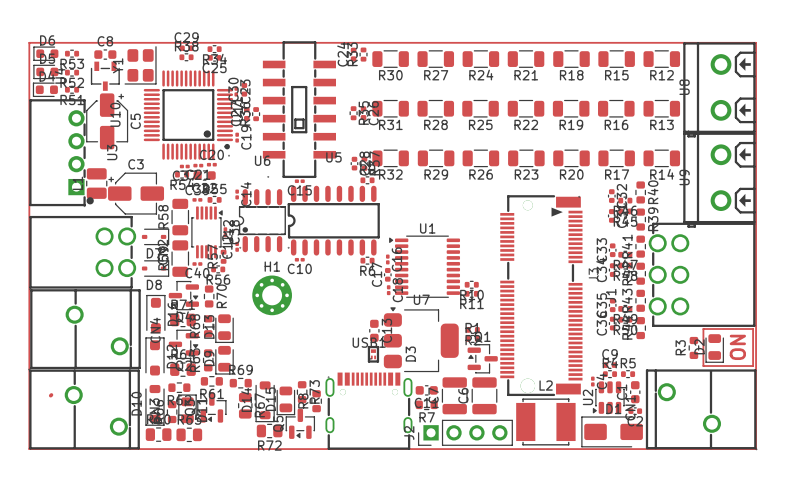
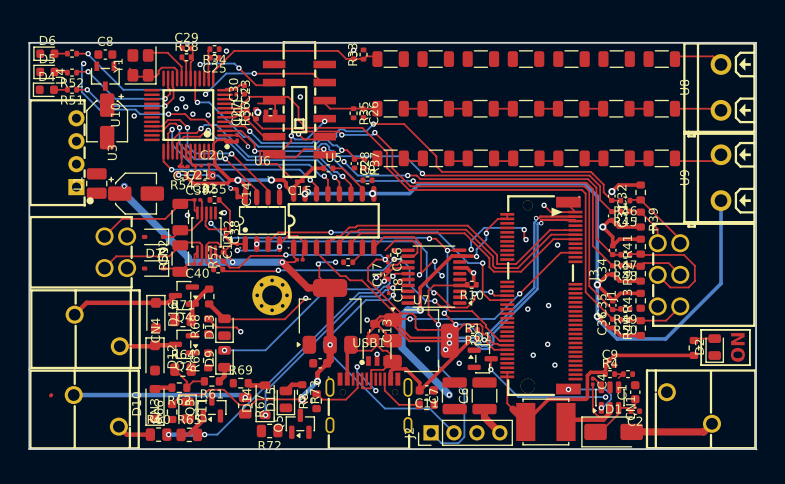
top track: (29, 42) (756, 42) (756, 449) (29, 449) (29, 42) -> none
board edge: none -> (29, 42) (756, 42) (756, 449) (29, 449) (29, 42)
top track: none -> (192, 50) (190, 78)
top track: none -> (208, 50) (208, 78)
via: none -> (353, 50)
via: none -> (226, 51)
top track: none -> (54, 53) (67, 53)
top track: none -> (76, 53) (88, 53)
bottom track: none -> (88, 53) (123, 89) (162, 89) (164, 91)
via: none -> (88, 53)
top track: none -> (149, 53) (167, 52) (181, 66) (181, 78)
C24 name: C24 (342, 54) -> none
top track: none -> (377, 56) (366, 56) (363, 59) (346, 58) (338, 50) (234, 50) (213, 71) (213, 78)
top track: none -> (674, 56) (712, 56) (721, 64)
top track: none -> (183, 59) (186, 62) (186, 78)
R53 name: R53 (72, 63) -> none
bottom track: none -> (83, 63) (81, 65) (81, 92) (99, 109) (135, 109) (140, 114) (168, 114)
via: none -> (83, 63)
bottom track: none -> (200, 64) (234, 63) (238, 68)
via: none -> (200, 64)
top track: none -> (129, 68) (137, 76) (155, 76) (161, 67) (174, 67) (177, 70) (177, 78)
top track: none -> (238, 68) (256, 85) (274, 85)
via: none -> (238, 68)
top track: none -> (67, 71) (54, 71)
top track: none -> (76, 71) (88, 71)
bottom track: none -> (88, 71) (115, 98) (165, 98)
via: none -> (88, 71)
top track: none -> (254, 73) (313, 73) (324, 85)
bottom track: none -> (254, 73) (226, 73) (205, 94)
via: none -> (254, 73)
R30 name: R30 (390, 75) -> none
R27 name: R27 (436, 75) -> none
R24 name: R24 (481, 75) -> none
R21 name: R21 (526, 75) -> none
R18 name: R18 (571, 75) -> none
R15 name: R15 (616, 75) -> none
R12 name: R12 (661, 75) -> none
top track: none -> (168, 78) (169, 93) (165, 98)
top track: none -> (172, 78) (173, 98) (164, 105)
top track: none -> (195, 78) (195, 100) (197, 102)
top track: none -> (244, 85) (224, 90)
top track: none -> (54, 89) (67, 89)
top track: none -> (76, 89) (87, 89)
bottom track: none -> (87, 89) (103, 105) (164, 105)
via: none -> (87, 89)
via: none -> (205, 94)
via: none -> (300, 96)
via: none -> (165, 98)
via: none -> (182, 98)
bottom track: none -> (197, 102) (209, 102) (243, 136) (248, 136) (258, 146) (314, 146) (320, 140) (327, 140) (341, 150)
via: none -> (197, 102)
top track: none -> (257, 103) (274, 103) (275, 112)
top track: none -> (324, 103) (330, 108) (377, 108)
via: none -> (164, 105)
via: none -> (185, 106)
top track: none -> (631, 106) (629, 108) (648, 108)
via: none -> (176, 108)
top track: none -> (224, 108) (238, 108) (250, 96) (288, 96) (298, 107) (298, 120) (306, 127) (362, 127) (387, 152) (387, 167) (409, 189) (581, 189) (585, 193) (585, 292) (613, 319) (620, 319)
top track: none -> (403, 108) (422, 108)
top track: none -> (448, 108) (467, 108)
top track: none -> (493, 108) (512, 108)
top track: none -> (539, 108) (557, 108)
top track: none -> (584, 108) (603, 108)
top track: none -> (674, 108) (719, 108)
top track: none -> (224, 112) (247, 110) (262, 128) (338, 131) (341, 134)
via: none -> (257, 112)
part: none -> (270, 112)
top track: none -> (168, 114) (185, 114) (190, 119) (205, 119) (213, 128) (213, 151) (213, 151) (213, 144) (217, 139) (224, 139)
via: none -> (168, 114)
via: none -> (192, 114)
via: none -> (134, 115)
via: none -> (208, 115)
top track: none -> (224, 117) (242, 115) (266, 139) (274, 139)
C5 name: C5 (135, 121) -> none
bottom track: none -> (324, 121) (306, 139) (294, 139) (291, 135)
via: none -> (324, 121)
top track: none -> (373, 124) (404, 124) (436, 156) (436, 166) (442, 171) (590, 171) (603, 184) (603, 192) (611, 200) (620, 200)
bottom track: none -> (373, 124) (366, 131) (339, 129) (336, 132) (336, 136) (318, 136) (312, 143) (261, 143) (249, 131)
via: none -> (373, 124)
R31 name: R31 (390, 124) -> none
R28 name: R28 (435, 124) -> none
R25 name: R25 (480, 124) -> none
R22 name: R22 (526, 124) -> none
R19 name: R19 (571, 124) -> none
R16 name: R16 (616, 124) -> none
R13 name: R13 (661, 124) -> none
top track: none -> (151, 126) (161, 126) (168, 120) (179, 120) (187, 127)
top track: none -> (224, 126) (244, 126) (249, 131)
top track: none -> (179, 127) (175, 123) (169, 123) (162, 130) (151, 130)
bottom track: none -> (179, 127) (179, 144) (194, 159) (225, 158)
via: none -> (179, 127)
bottom track: none -> (187, 127) (187, 145) (195, 153) (231, 153)
via: none -> (187, 127)
top track: none -> (201, 128) (196, 133) (179, 133) (172, 139) (172, 151)
bottom track: none -> (201, 128) (204, 124) (216, 124) (248, 156) (318, 156) (334, 171) (342, 176)
via: none -> (201, 128)
top track: none -> (172, 129) (168, 133) (168, 151)
bottom track: none -> (172, 129) (172, 144) (192, 164) (309, 164) (320, 176) (324, 176)
via: none -> (172, 129)
top track: none -> (208, 130) (200, 136) (183, 136) (177, 143) (177, 151)
bottom track: none -> (208, 130) (216, 138) (225, 138) (247, 160) (317, 160) (334, 177)
via: none -> (208, 130)
top track: none -> (224, 130) (241, 130) (254, 144) (254, 151)
via: none -> (249, 131)
top track: none -> (374, 132) (392, 150) (392, 168) (410, 186) (584, 186) (589, 191) (589, 286) (612, 309) (620, 308)
bottom track: none -> (374, 132) (372, 134) (341, 134)
via: none -> (374, 132)
top track: none -> (298, 134) (303, 139) (324, 139)
via: none -> (298, 134)
via: none -> (341, 134)
top track: none -> (224, 135) (239, 136) (247, 146)
top track: none -> (291, 135) (291, 141) (281, 150) (260, 150) (260, 163) (277, 163) (291, 178)
via: none -> (291, 135)
C19 name: C19 (246, 137) -> none
top track: none -> (225, 140) (237, 141)
via: none -> (247, 146)
top track: none -> (323, 149) (304, 149) (295, 157) (274, 157)
bottom track: none -> (323, 149) (355, 180) (413, 180)
via: none -> (323, 149)
top track: none -> (341, 150) (347, 150) (355, 158) (364, 158)
via: none -> (341, 150)
top track: none -> (163, 151) (163, 161) (171, 169)
top track: none -> (181, 151) (181, 163) (178, 166) (186, 167)
top track: none -> (213, 151) (214, 164) (230, 180) (237, 180)
bottom track: none -> (254, 151) (318, 151) (318, 146) (321, 143) (326, 143) (329, 149) (338, 156) (405, 156) (422, 173)
via: none -> (254, 151)
top track: none -> (231, 153) (268, 190) (268, 197)
via: none -> (231, 153)
top track: none -> (225, 158) (256, 190) (256, 197)
via: none -> (225, 158)
top track: none -> (717, 158) (721, 154) (714, 161) (674, 161)
top track: none -> (190, 160) (186, 156) (186, 151) (190, 151) (190, 162) (192, 165) (195, 165) (195, 173) (197, 175)
bottom track: none -> (343, 161) (357, 175) (407, 175)
via: none -> (343, 161)
top track: none -> (403, 161) (422, 161)
top track: none -> (449, 161) (467, 161)
top track: none -> (494, 161) (513, 161)
top track: none -> (539, 161) (558, 161)
top track: none -> (584, 161) (603, 161)
top track: none -> (629, 161) (648, 161)
C3 name: C3 (136, 164) -> none
top track: none -> (209, 164) (208, 171) (211, 175)
top track: none -> (323, 168) (312, 168) (293, 187) (293, 193) (286, 186) (283, 180) (271, 180)
part: none -> (328, 168)
top track: none -> (332, 168) (342, 168) (362, 188) (362, 193)
bottom track: none -> (171, 169) (299, 169) (310, 180)
via: none -> (171, 169)
top track: none -> (422, 173) (424, 175) (589, 175) (600, 186) (600, 199) (611, 211) (620, 211)
via: none -> (422, 173)
R32 name: R32 (390, 174) -> none
R29 name: R29 (436, 174) -> none
R26 name: R26 (481, 174) -> none
R23 name: R23 (526, 174) -> none
R20 name: R20 (571, 174) -> none
R17 name: R17 (617, 174) -> none
R14 name: R14 (662, 174) -> none
bottom track: none -> (178, 175) (218, 175) (230, 188)
via: none -> (178, 175)
via: none -> (212, 175)
top track: none -> (407, 175) (416, 175) (420, 179) (588, 179) (596, 187) (596, 238) (612, 254) (620, 254)
via: none -> (407, 175)
top track: none -> (186, 176) (193, 183) (227, 183) (230, 180) (237, 180)
top track: none -> (324, 176) (327, 179) (327, 193)
via: none -> (324, 176)
top track: none -> (342, 176) (350, 184) (350, 193)
via: none -> (342, 176)
top track: none -> (334, 177) (339, 182) (339, 193)
via: none -> (334, 177)
top track: none -> (237, 180) (245, 185) (245, 197) (239, 197) (237, 194)
via: none -> (237, 180)
bottom track: none -> (271, 180) (237, 180)
via: none -> (271, 180)
top track: none -> (310, 180) (316, 186) (316, 193)
via: none -> (310, 180)
top track: none -> (413, 180) (414, 182) (586, 182) (592, 189)
via: none -> (413, 180)
top track: none -> (640, 185) (618, 185) (611, 191)
bottom track: none -> (124, 186) (124, 193) (188, 257) (188, 262) (282, 262)
via: none -> (124, 186)
via: none -> (279, 186)
top track: none -> (230, 188) (237, 188)
via: none -> (230, 188)
top track: none -> (592, 190) (592, 245) (612, 265) (620, 265)
via: none -> (611, 191)
R40 name: R40 (653, 192) -> none
bottom track: none -> (305, 193) (409, 193) (419, 183) (584, 183) (597, 196) (597, 319) (617, 338) (665, 338) (721, 283) (721, 200)
via: none -> (305, 193)
via: none -> (372, 193)
top track: none -> (200, 199) (201, 219) (191, 230) (180, 230) (173, 236) (163, 236)
top track: none -> (219, 199) (229, 210) (229, 232) (225, 235) (225, 237) (231, 243)
top track: none -> (629, 200) (640, 199) (680, 239) (680, 243)
top track: none -> (568, 202) (568, 205) (575, 212) (550, 212) (544, 205)
via: none -> (544, 205)
top track: none -> (629, 211) (639, 211) (657, 229) (657, 243)
top track: none -> (197, 212) (194, 210) (194, 199) (184, 199) (165, 218) (122, 218) (104, 236)
top track: none -> (206, 212) (205, 225) (209, 229) (225, 229)
via: none -> (224, 212)
top track: none -> (507, 214) (507, 218) (497, 218) (486, 230) (486, 233)
via: none -> (187, 215)
R58 name: R58 (163, 216) -> none
top track: none -> (575, 216) (536, 218)
bottom track: none -> (536, 218) (534, 222) (534, 287) (487, 334) (490, 337) (490, 342) (486, 345) (482, 345) (474, 337) (451, 337) (449, 335)
via: none -> (536, 218)
top track: none -> (566, 219) (541, 219) (541, 223)
top track: none -> (566, 220) (575, 221)
bottom track: none -> (210, 223) (225, 237) (429, 238)
via: none -> (210, 223)
bottom track: none -> (541, 223) (537, 224) (537, 289) (491, 334) (493, 343) (488, 348) (480, 348) (472, 341) (451, 341) (449, 343)
via: none -> (541, 223)
via: none -> (602, 226)
top track: none -> (640, 226) (618, 226) (611, 220) (602, 226) (612, 236) (612, 245) (619, 239) (640, 239)
top track: none -> (524, 229) (526, 239)
bottom track: none -> (524, 229) (522, 227) (484, 227) (471, 240) (471, 249)
via: none -> (524, 229)
top track: none -> (575, 230) (549, 230) (516, 264) (497, 264) (497, 254) (467, 225) (357, 225) (349, 227) (340, 236) (331, 239) (327, 242) (327, 247)
top track: none -> (331, 232) (278, 232) (268, 244)
bottom track: none -> (331, 232) (437, 232) (468, 263) (482, 263)
via: none -> (331, 232)
bottom track: none -> (486, 233) (486, 239) (476, 249) (476, 256)
via: none -> (486, 233)
top track: none -> (575, 234) (551, 234) (517, 268) (495, 268) (493, 265) (493, 256) (466, 229) (359, 229) (350, 231) (339, 242) (339, 247)
top track: none -> (429, 238) (435, 238) (447, 250) (459, 250)
via: none -> (429, 238)
via: none -> (526, 239)
top track: none -> (575, 239) (553, 239) (521, 271) (493, 271) (489, 267) (489, 258) (464, 233) (360, 233) (350, 242) (350, 247)
top track: none -> (231, 243) (245, 244)
top track: none -> (231, 243) (223, 252)
bottom track: none -> (256, 244) (259, 241) (415, 241) (426, 252) (426, 285) (433, 292)
via: none -> (256, 244)
via: none -> (557, 245)
top track: none -> (279, 246) (279, 244) (287, 236) (297, 236) (305, 243) (302, 259)
bottom track: none -> (279, 246) (275, 250) (237, 250)
via: none -> (279, 246)
top track: none -> (293, 247) (293, 256) (296, 259) (294, 262) (282, 262) (308, 287) (331, 287)
top track: none -> (316, 247) (316, 252) (340, 276) (345, 276) (349, 280) (361, 280) (400, 318) (410, 318)
top track: none -> (362, 247) (362, 252) (352, 262)
top track: none -> (373, 247) (384, 236) (413, 236) (421, 244) (421, 273)
via: none -> (471, 249)
via: none -> (237, 250)
top track: none -> (385, 250) (395, 240) (412, 240) (417, 245) (417, 252) (414, 256) (408, 256)
bottom track: none -> (447, 250) (447, 310) (444, 313)
via: none -> (447, 250)
C33 name: C33 (601, 250) -> none
top track: none -> (197, 251) (194, 254) (194, 264) (188, 264) (180, 271) (177, 268) (163, 268)
top track: none -> (210, 251) (210, 260) (224, 271) (278, 270)
top track: none -> (215, 251) (229, 267) (238, 267) (250, 255) (285, 254)
top track: none -> (223, 252) (223, 248) (217, 242) (208, 242) (206, 244) (206, 262) (213, 269)
top track: none -> (223, 252) (232, 262)
top track: none -> (575, 252) (560, 252) (519, 293)
bottom track: none -> (285, 254) (380, 254) (385, 259)
via: none -> (285, 254)
part: none -> (394, 254)
top track: none -> (629, 254) (684, 254) (694, 265) (694, 281) (688, 287) (670, 287) (657, 274)
top track: none -> (472, 256) (451, 256) (420, 287) (420, 310)
via: none -> (476, 256)
top track: none -> (376, 259) (368, 267) (368, 280) (401, 313) (412, 313) (415, 316) (415, 327) (417, 329) (424, 329)
top track: none -> (376, 259) (385, 259)
via: none -> (385, 259)
via: none -> (394, 259)
R6: (367, 260) -> none
top track: none -> (408, 261) (391, 264) (378, 277) (376, 277)
top track: none -> (434, 261) (419, 274)
bottom track: none -> (434, 261) (434, 268) (442, 275)
via: none -> (434, 261)
via: none -> (232, 262)
via: none -> (282, 262)
bottom track: none -> (335, 262) (320, 262) (318, 264)
via: none -> (335, 262)
part: none -> (348, 262)
top track: none -> (482, 263) (482, 292) (489, 300) (507, 300)
via: none -> (482, 263)
top track: none -> (200, 264) (201, 244) (199, 242) (183, 242) (169, 256) (116, 256) (104, 268)
top track: none -> (318, 264) (319, 277) (330, 287) (330, 360) (317, 373) (317, 381)
via: none -> (318, 264)
top track: none -> (629, 265) (640, 266) (643, 263) (668, 263) (680, 274)
H1 name: H1 (272, 266) -> none
U1: (424, 266) -> none
top track: none -> (408, 267) (393, 268) (384, 277) (384, 281)
top track: none -> (459, 267) (466, 267) (473, 272) (473, 280)
C10 name: C10 (299, 268) -> none
bottom track: none -> (278, 270) (383, 270) (394, 259) (401, 259) (409, 267) (409, 284) (425, 301) (434, 301)
via: none -> (278, 270)
via: none -> (473, 272)
top track: none -> (408, 273) (395, 273) (392, 276)
via: none -> (419, 274)
via: none -> (442, 275)
bottom track: none -> (392, 276) (389, 279) (389, 283) (377, 292) (359, 292) (217, 434) (168, 434)
via: none -> (392, 276)
part: none -> (436, 276)
via: none -> (376, 277)
R56 name: R56 (218, 279) -> none
top track: none -> (408, 279) (401, 279) (392, 287)
bottom track: none -> (384, 281) (376, 289) (326, 289) (265, 350) (224, 350)
via: none -> (384, 281)
top track: none -> (640, 281) (619, 281) (612, 274) (607, 274) (597, 284) (612, 300) (620, 293) (640, 293)
D8 name: D8 (154, 284) -> none
via: none -> (597, 284)
top track: none -> (473, 286) (433, 285) (428, 290) (428, 314) (438, 324)
bottom track: none -> (392, 287) (385, 290) (379, 296) (360, 296) (265, 391) (265, 415)
via: none -> (392, 287)
top track: none -> (209, 289) (192, 304) (191, 319)
top track: none -> (490, 291) (494, 295) (507, 295)
bottom track: none -> (490, 291) (476, 291) (474, 293)
via: none -> (490, 291)
top track: none -> (433, 292) (436, 292) (451, 307) (467, 307) (474, 300) (474, 293)
via: none -> (433, 292)
R11: (471, 293) -> none
via: none -> (474, 293)
bottom track: none -> (519, 293) (494, 318) (410, 318)
via: none -> (519, 293)
top track: none -> (175, 295) (168, 302) (86, 302) (74, 314)
bottom track: none -> (393, 295) (388, 300) (365, 300) (323, 342) (323, 347) (384, 408) (429, 408) (453, 432)
via: none -> (393, 295)
R70 name: R70 (221, 296) -> none
top track: none -> (305, 298) (284, 319) (225, 319) (209, 303)
via: none -> (305, 298)
top track: none -> (434, 301) (449, 311) (472, 311) (499, 340) (507, 340)
via: none -> (434, 301)
via: none -> (548, 305)
top track: none -> (680, 306) (666, 320) (629, 319)
via: none -> (527, 309)
bottom track: none -> (420, 310) (407, 310) (402, 315) (402, 347) (449, 394)
via: none -> (420, 310)
top track: none -> (444, 313) (455, 324)
via: none -> (444, 313)
part: none -> (329, 316)
top track: none -> (597, 316) (620, 335) (640, 335)
via: none -> (597, 316)
top track: none -> (208, 318) (216, 327) (236, 327) (240, 331)
via: none -> (410, 318)
via: none -> (367, 319)
bottom track: none -> (438, 324) (438, 366) (464, 391) (464, 437) (458, 443) (441, 443) (431, 432)
via: none -> (438, 324)
bottom track: none -> (455, 324) (468, 324) (484, 339)
via: none -> (455, 324)
top track: none -> (424, 329) (458, 329) (463, 324) (480, 324) (482, 326) (482, 333)
line: none -> (701, 329) (749, 329) (749, 365) (701, 365) (701, 329)
top track: (703, 329) (753, 329) (753, 366) (703, 366) (703, 329) -> none
via: none -> (240, 331)
top track: none -> (482, 333) (486, 334) (493, 343) (507, 345)
top track: none -> (449, 335) (447, 337) (410, 337) (389, 316) (380, 316) (375, 321) (375, 326) (368, 333) (368, 340)
via: none -> (449, 335)
top track: none -> (468, 338) (468, 342) (420, 390)
top track: none -> (714, 338) (695, 338) (693, 340)
top track: none -> (484, 339) (494, 349) (507, 349)
via: none -> (484, 339)
top track: none -> (385, 340) (385, 333) (378, 326) (381, 319) (388, 319) (409, 341) (447, 341) (449, 343)
via: none -> (449, 343)
top track: none -> (175, 344) (119, 346)
via: none -> (330, 344)
top track: none -> (350, 344) (347, 348) (347, 379)
top track: none -> (350, 344) (356, 350) (371, 350) (377, 345)
via: none -> (547, 344)
top track: none -> (377, 345) (393, 356) (393, 368)
R3 name: R3 (680, 347) -> none
via: none -> (427, 348)
via: none -> (445, 349)
via: none -> (224, 350)
part: none -> (375, 350)
D3: (373, 354) -> none
via: none -> (377, 354)
via: none -> (533, 355)
top track: none -> (693, 355) (614, 355) (605, 364) (605, 374) (603, 372) (590, 372) (587, 375) (585, 399) (548, 399) (525, 421) (507, 403) (507, 372)
top track: none -> (491, 358) (490, 369)
top track: none -> (385, 361) (385, 367) (383, 369) (371, 370) (370, 388) (362, 387) (362, 379)
part: none -> (320, 363)
via: none -> (459, 363)
R5 name: R5 (628, 363) -> none
via: none -> (554, 365)
bottom track: none -> (357, 366) (357, 372) (375, 390)
via: none -> (357, 366)
top track: none -> (224, 367) (224, 376) (219, 381)
top track: none -> (174, 369) (186, 381) (186, 387) (193, 381) (204, 381)
bottom track: none -> (490, 369) (518, 397) (605, 397)
via: none -> (490, 369)
top track: none -> (614, 374) (623, 374)
top track: none -> (622, 374) (618, 378)
top track: none -> (391, 378) (390, 371) (393, 368) (405, 368) (419, 382) (419, 390)
top track: none -> (592, 378) (601, 387)
top track: none -> (357, 379) (357, 387) (345, 399) (322, 399) (316, 393)
top track: none -> (384, 379) (384, 390) (399, 404) (419, 404)
bottom track: none -> (317, 381) (302, 396) (302, 399)
via: none -> (317, 381)
top track: none -> (248, 383) (250, 385) (265, 385)
top track: none -> (302, 384) (292, 384) (285, 390)
top track: none -> (592, 384) (592, 411) (598, 416) (604, 416) (609, 411) (609, 407) (609, 412) (603, 419) (568, 419) (566, 421)
L2 name: L2 (546, 385) -> none
top track: none -> (171, 387) (154, 389)
bottom track: none -> (568, 389) (605, 389) (611, 394) (611, 399) (601, 407)
via: none -> (568, 389)
via: none -> (375, 390)
via: none -> (449, 394)
bottom track: none -> (73, 395) (242, 395) (245, 397)
via: none -> (245, 397)
U2 name: U2 (587, 397) -> none
via: none -> (605, 397)
top track: none -> (302, 399) (256, 399) (251, 404) (239, 404) (223, 389) (208, 389) (203, 394) (181, 394) (172, 404)
via: none -> (302, 399)
top track: none -> (635, 399) (635, 406) (630, 411) (627, 407) (618, 407) (618, 413) (600, 431) (595, 431)
via: none -> (601, 407)
top track: none -> (484, 409) (484, 417) (499, 432)
via: none -> (265, 415)
top track: none -> (203, 416) (203, 419) (188, 434)
R7 name: R7 (427, 417) -> none
top track: none -> (711, 423) (703, 431) (631, 431)
top track: none -> (118, 426) (126, 434) (152, 434)
via: none -> (168, 434)
via: none -> (204, 434)

